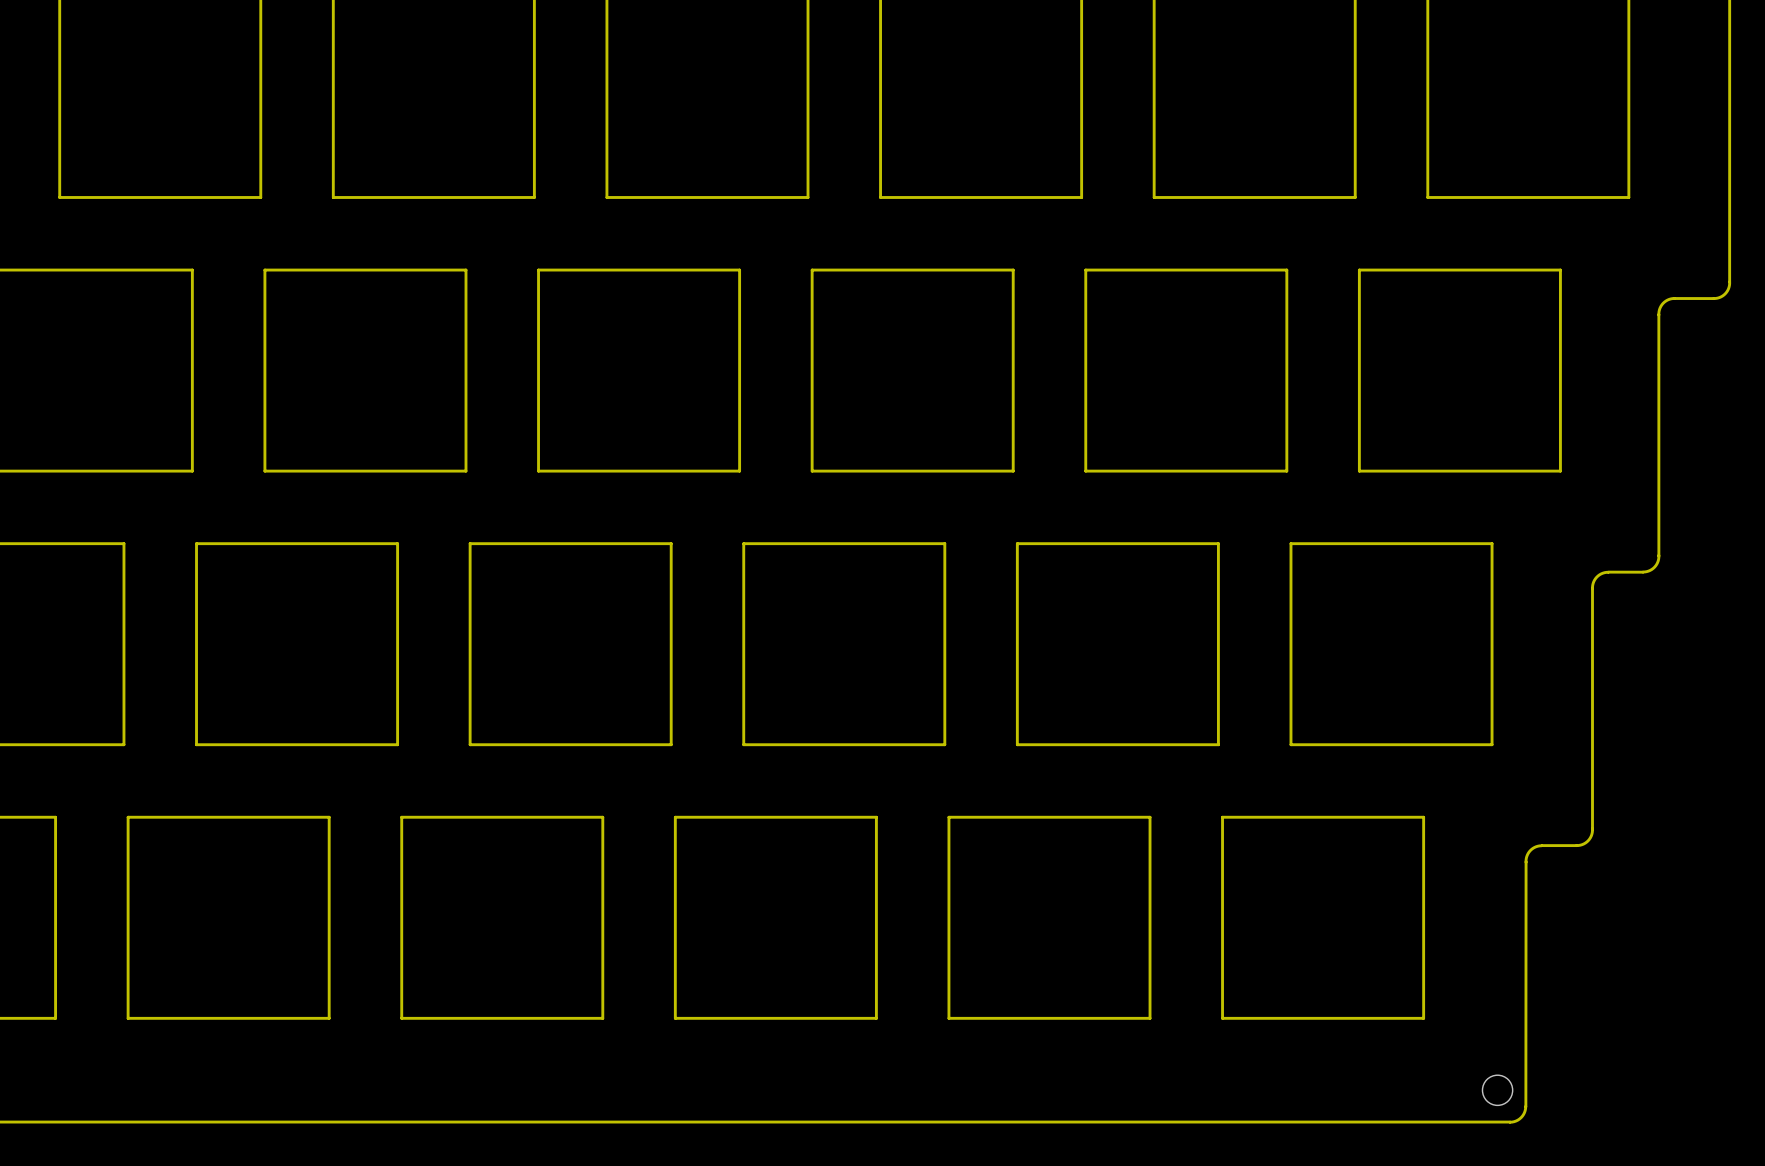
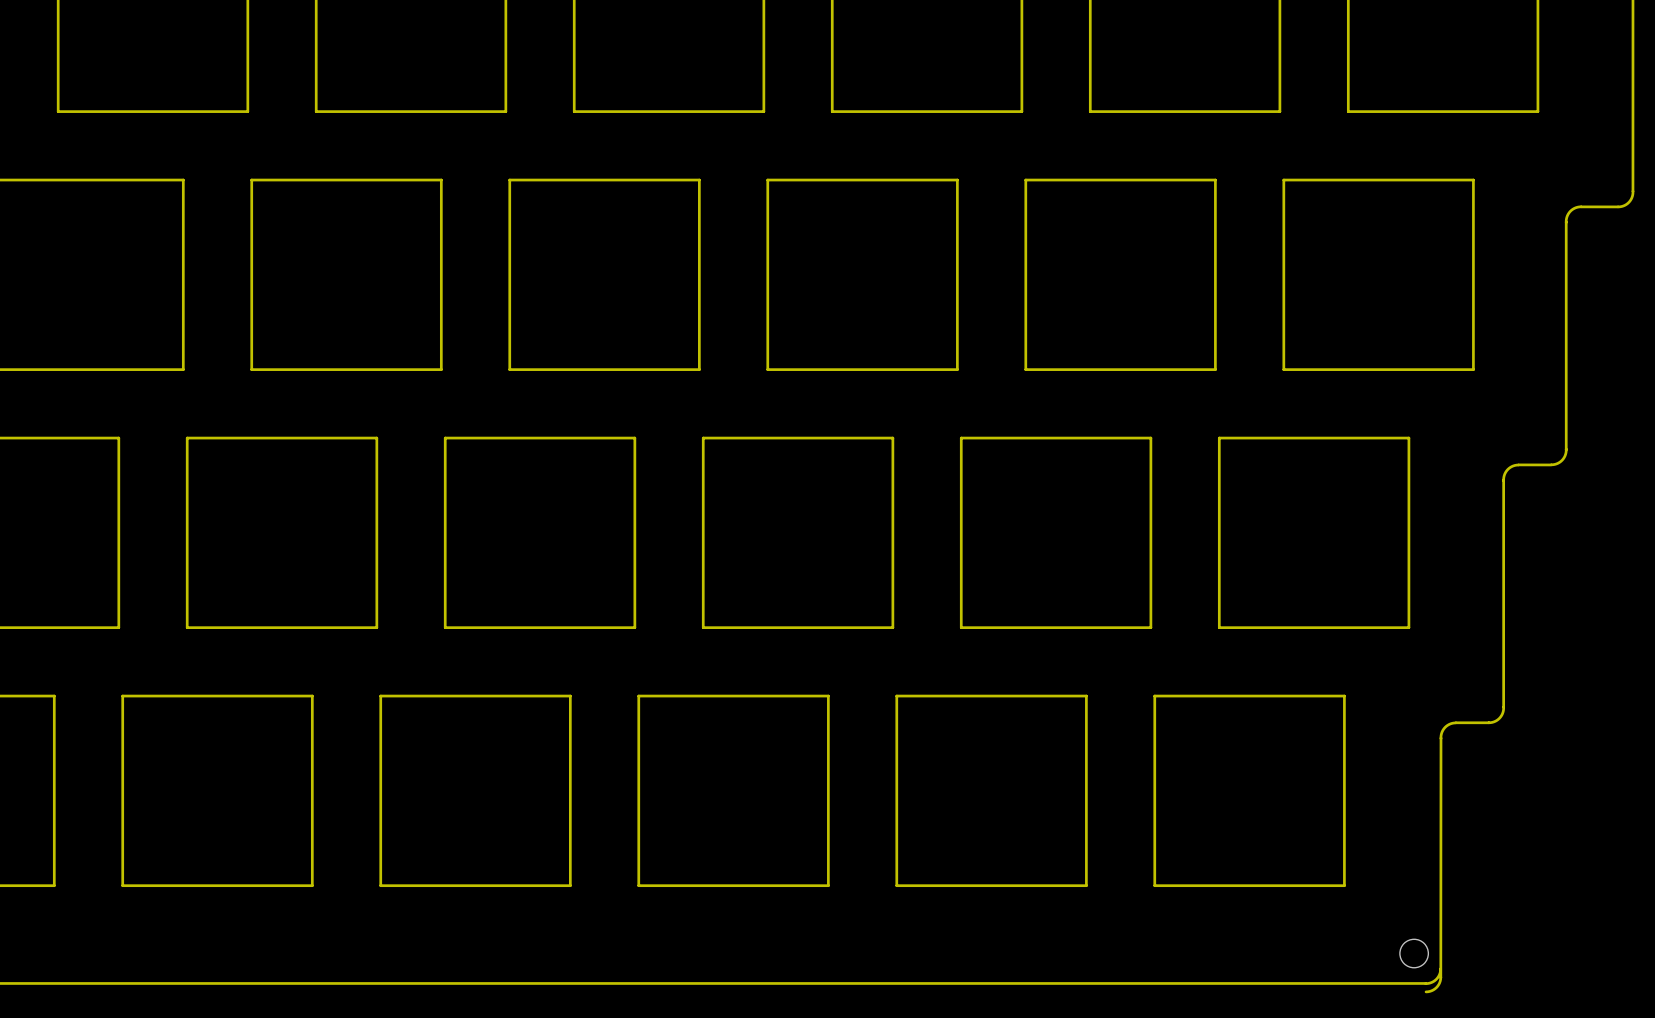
board edge: none -> (1440, 977) (1436, 987) (1426, 991)

